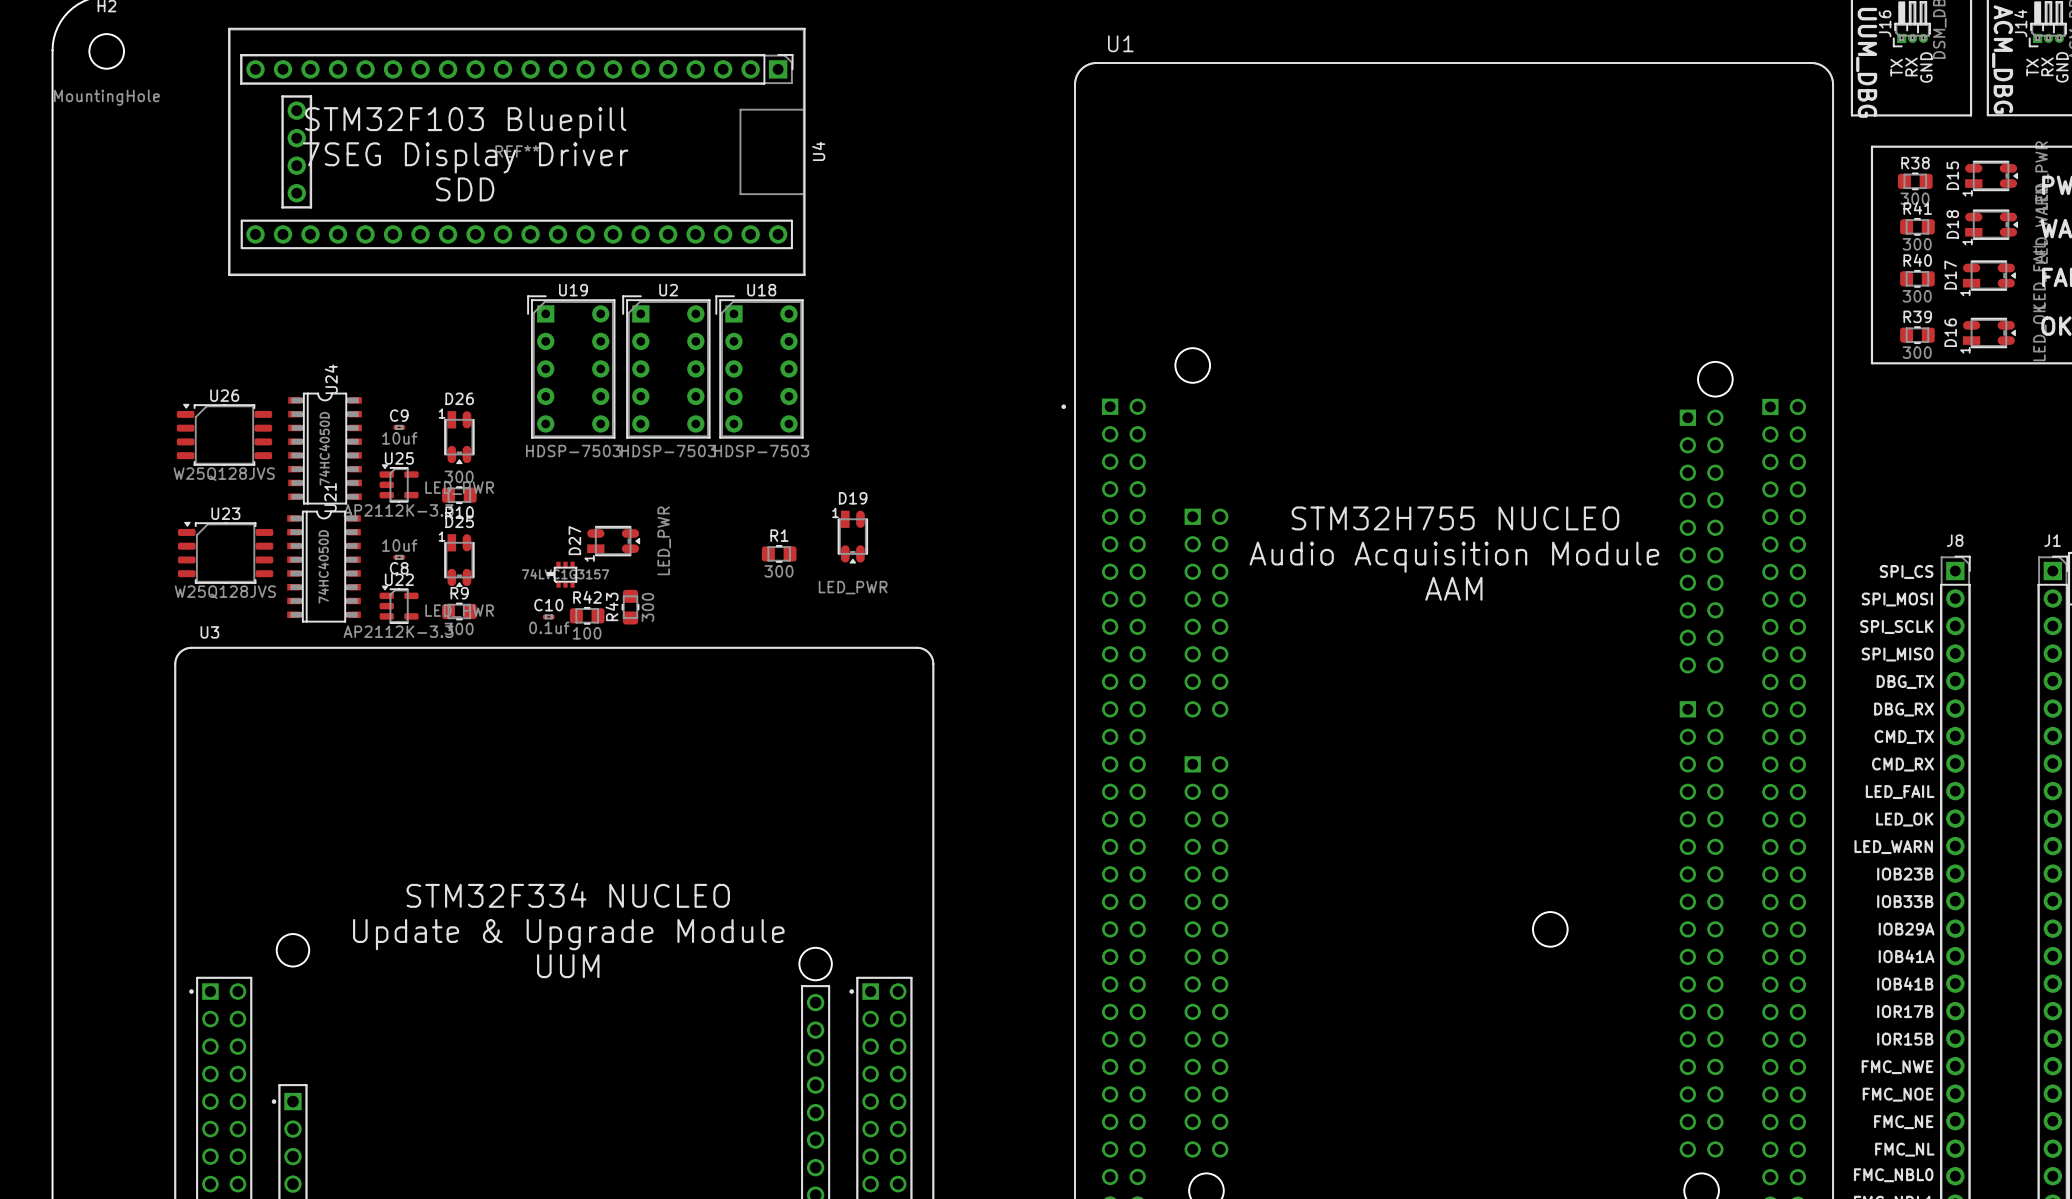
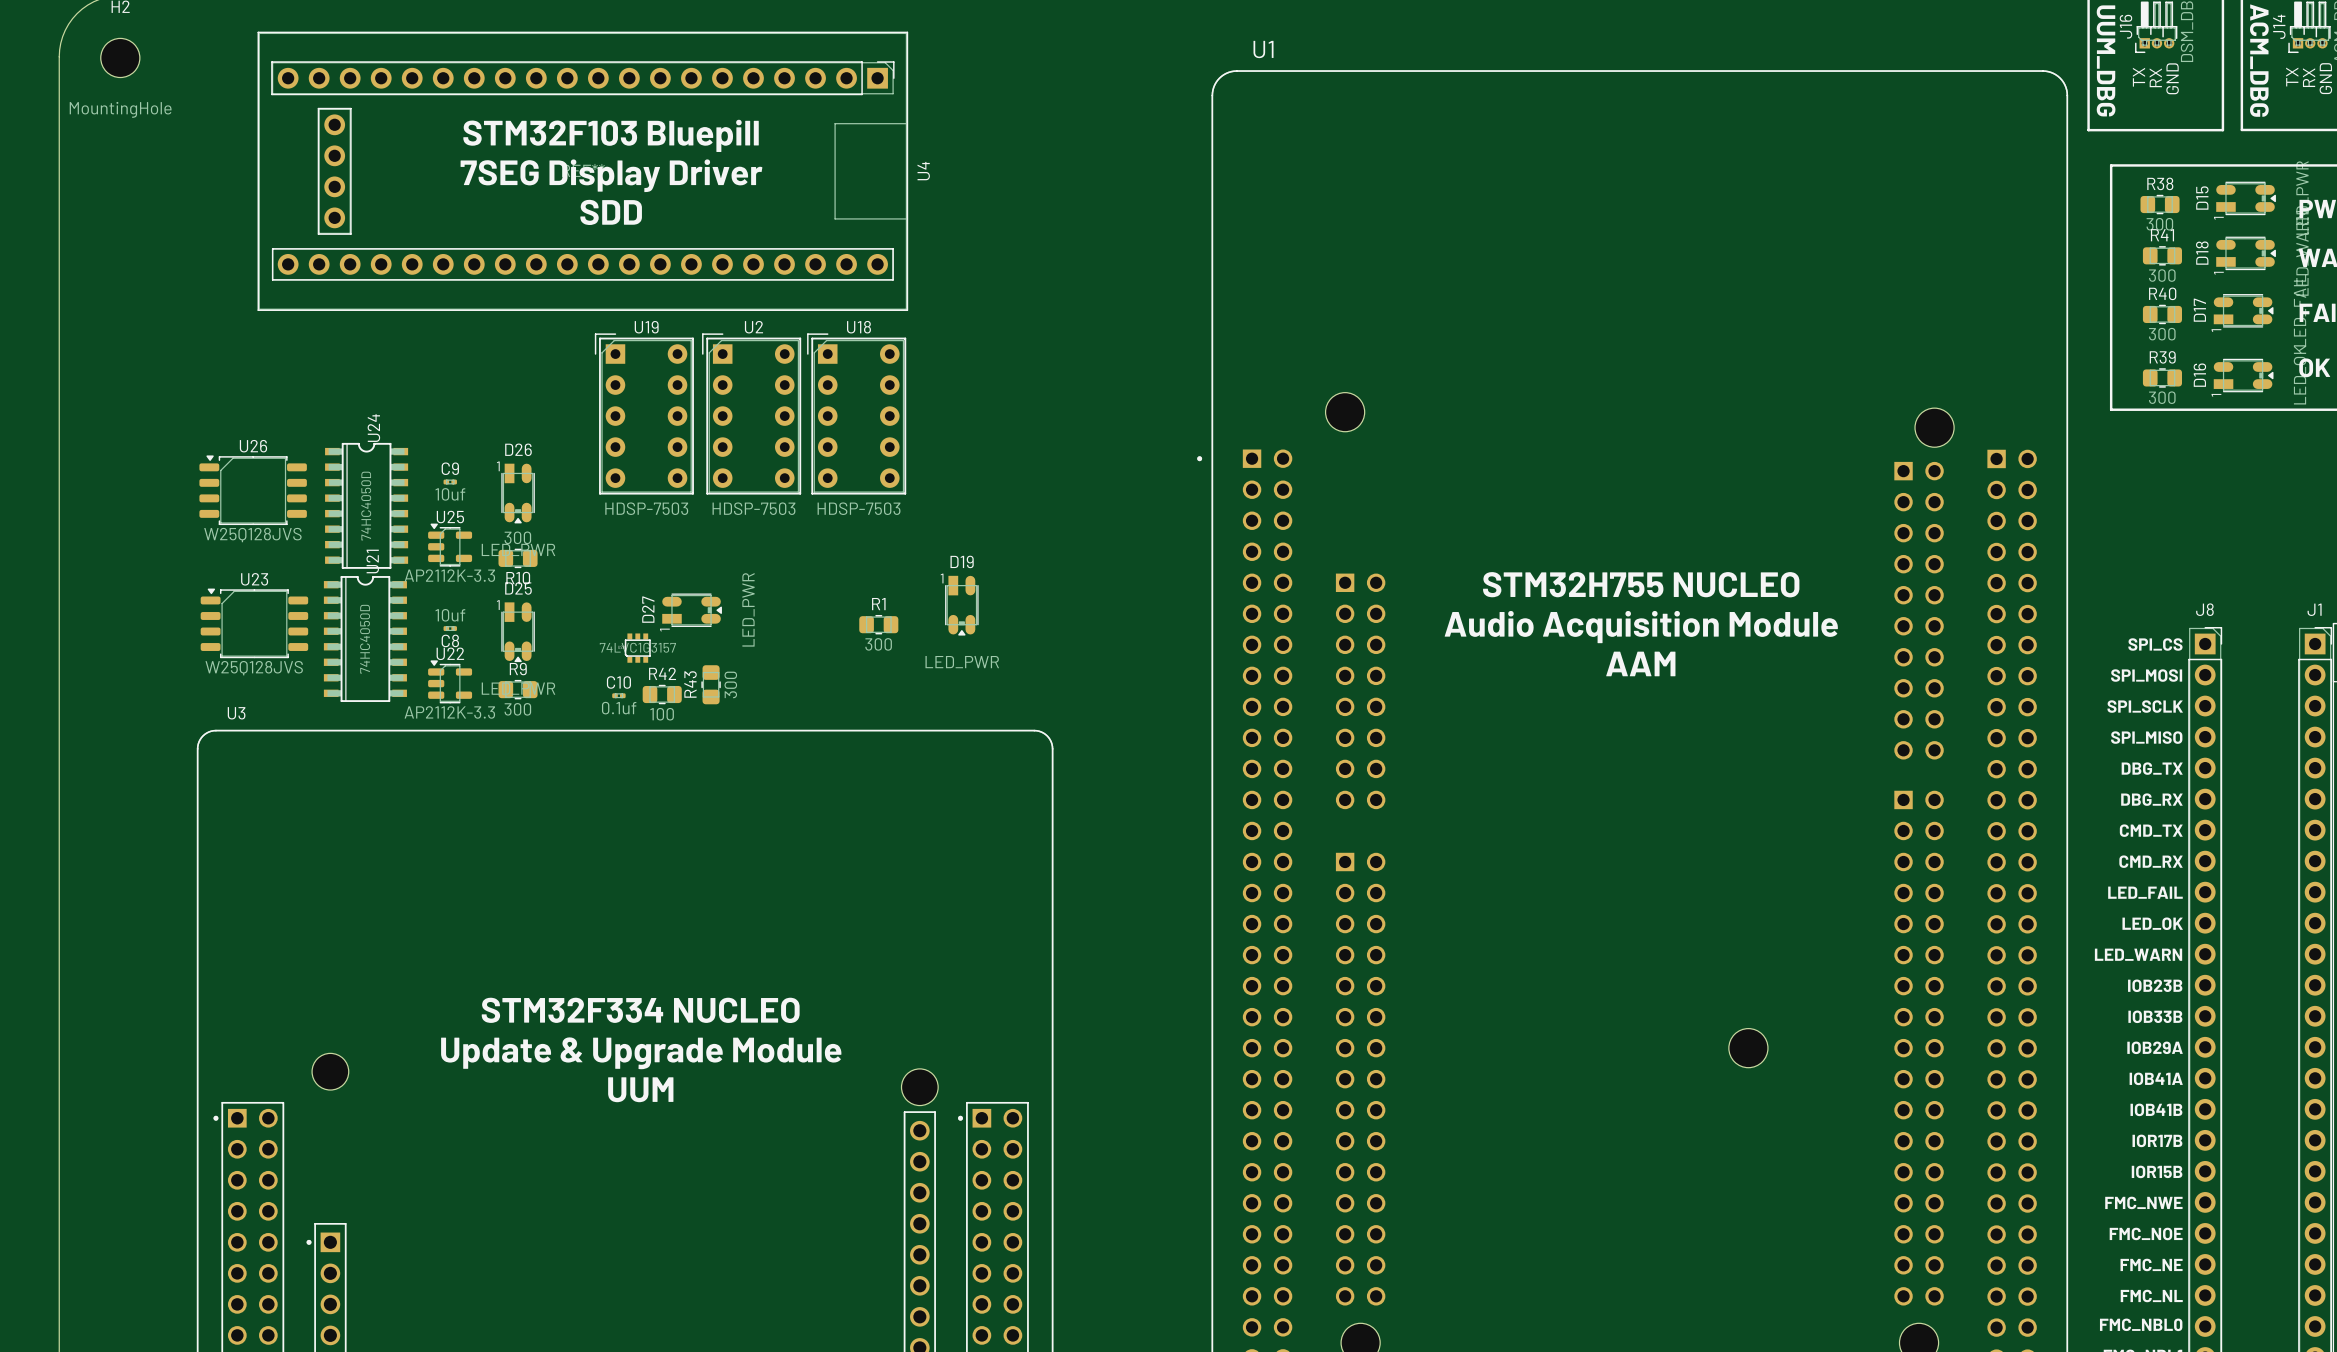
text position: STM32F103 Bluepill (465, 122) -> STM32F103 Bluepill (611, 135)
text position: 7SEG Display Driver (465, 157) -> 7SEG Display Driver (611, 175)
text position: SDD (465, 189) -> SDD (611, 212)

